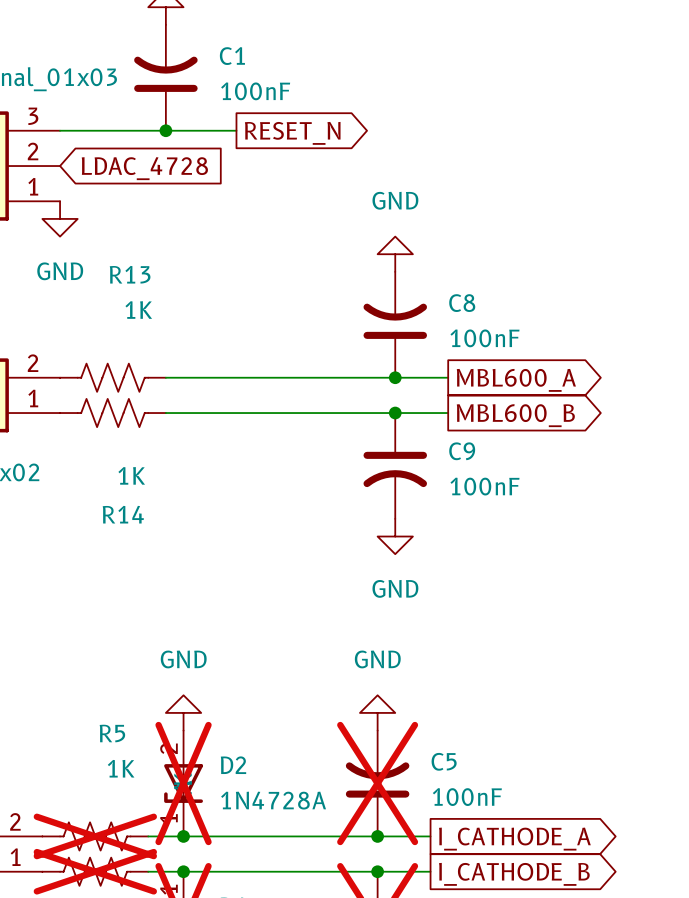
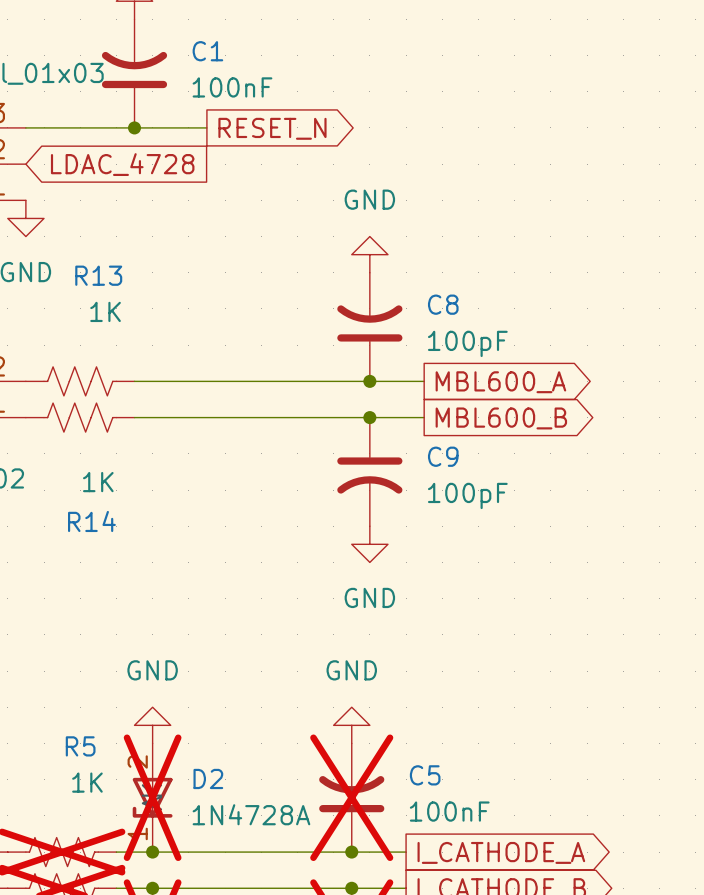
C8 value: 100nF (484, 338) -> 100pF (467, 343)
C9 value: 100nF (484, 486) -> 100pF (467, 495)

